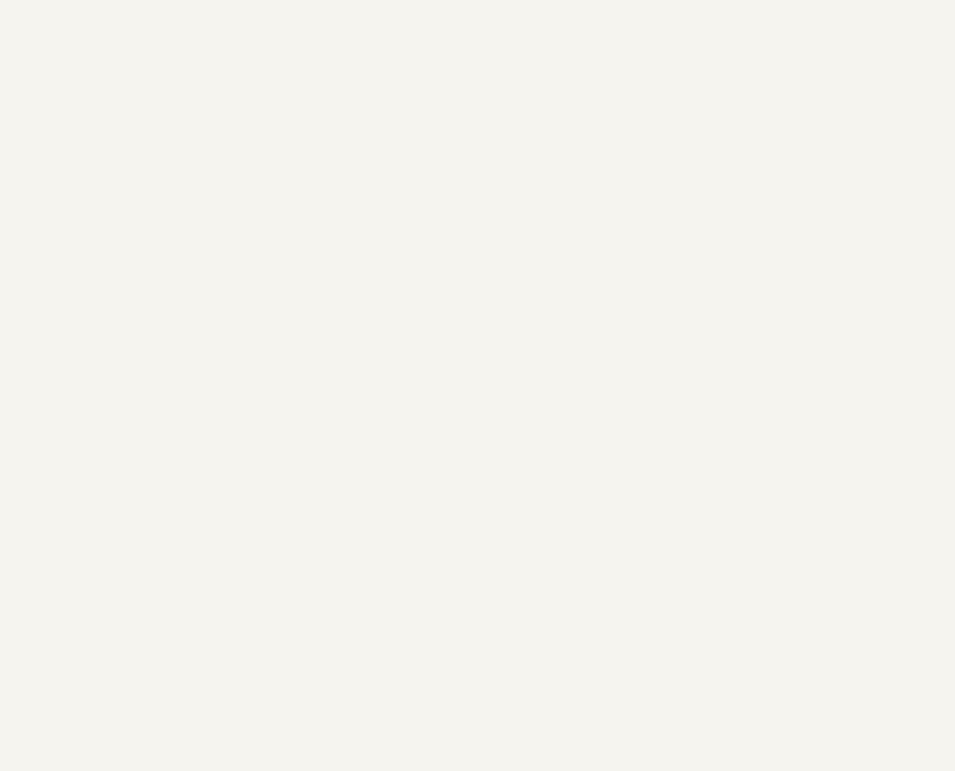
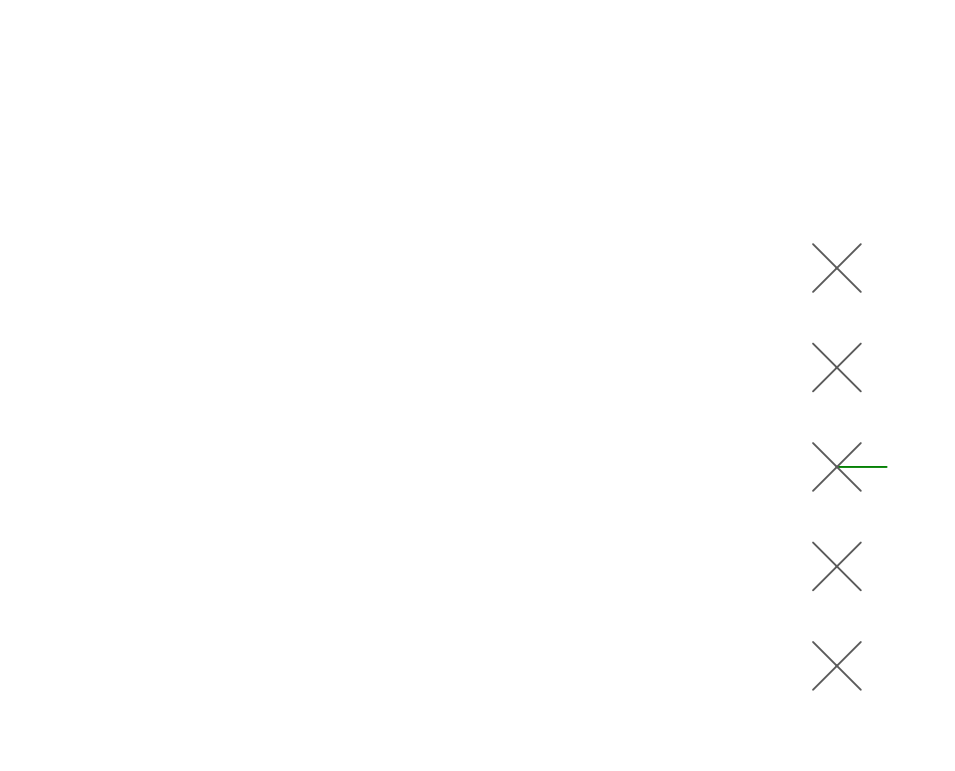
no-connect mark: none -> (836, 268)
no-connect mark: none -> (836, 367)
wire: none -> (836, 466) (886, 466)
no-connect mark: none -> (836, 466)
no-connect mark: none -> (836, 566)
no-connect mark: none -> (836, 665)

